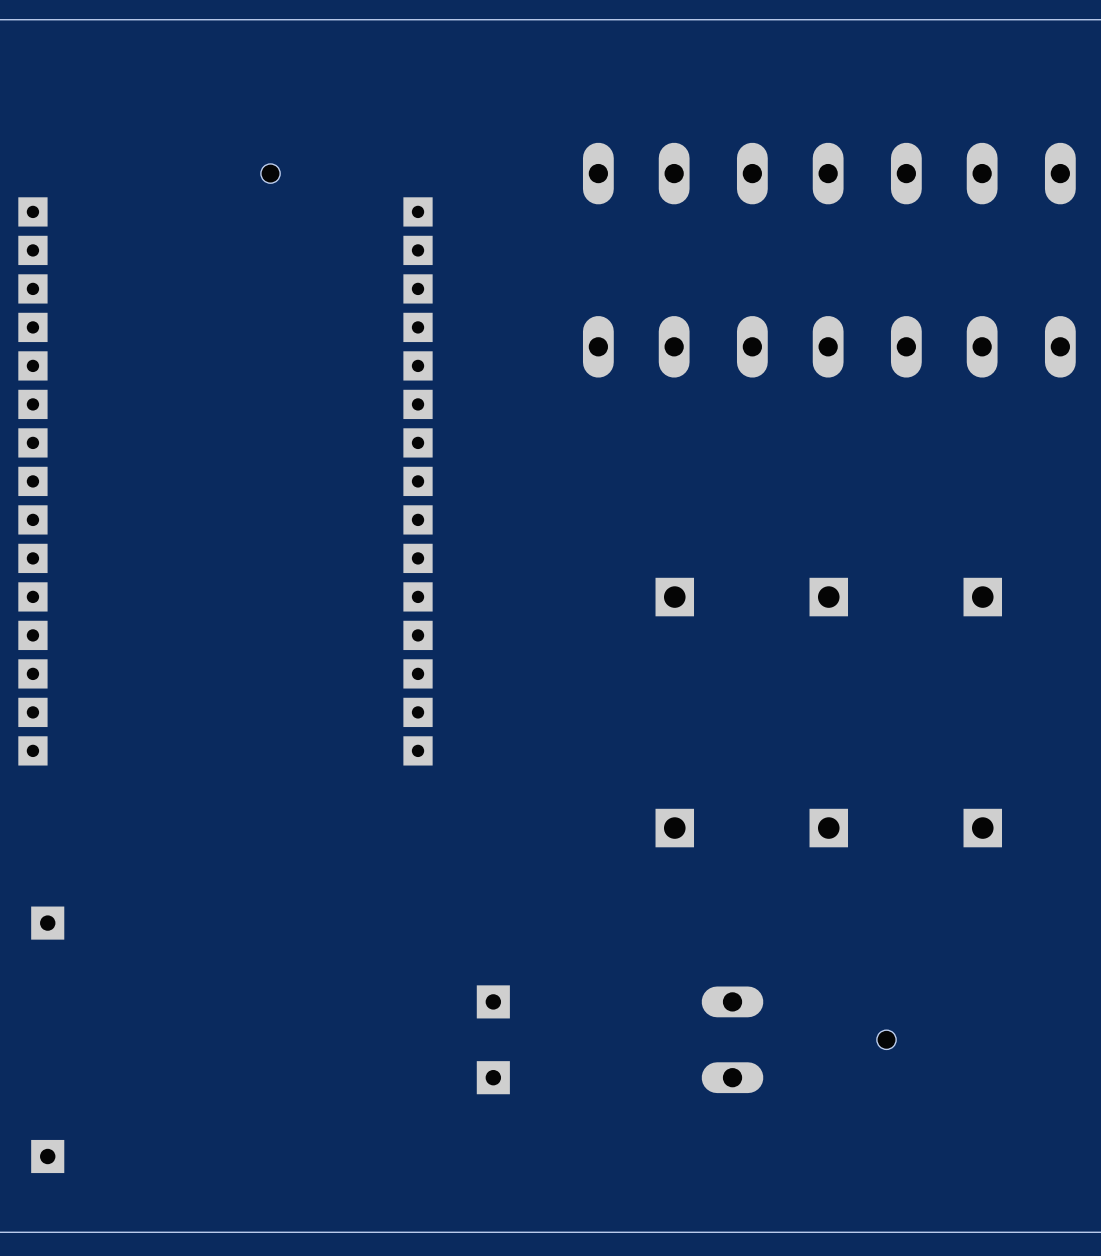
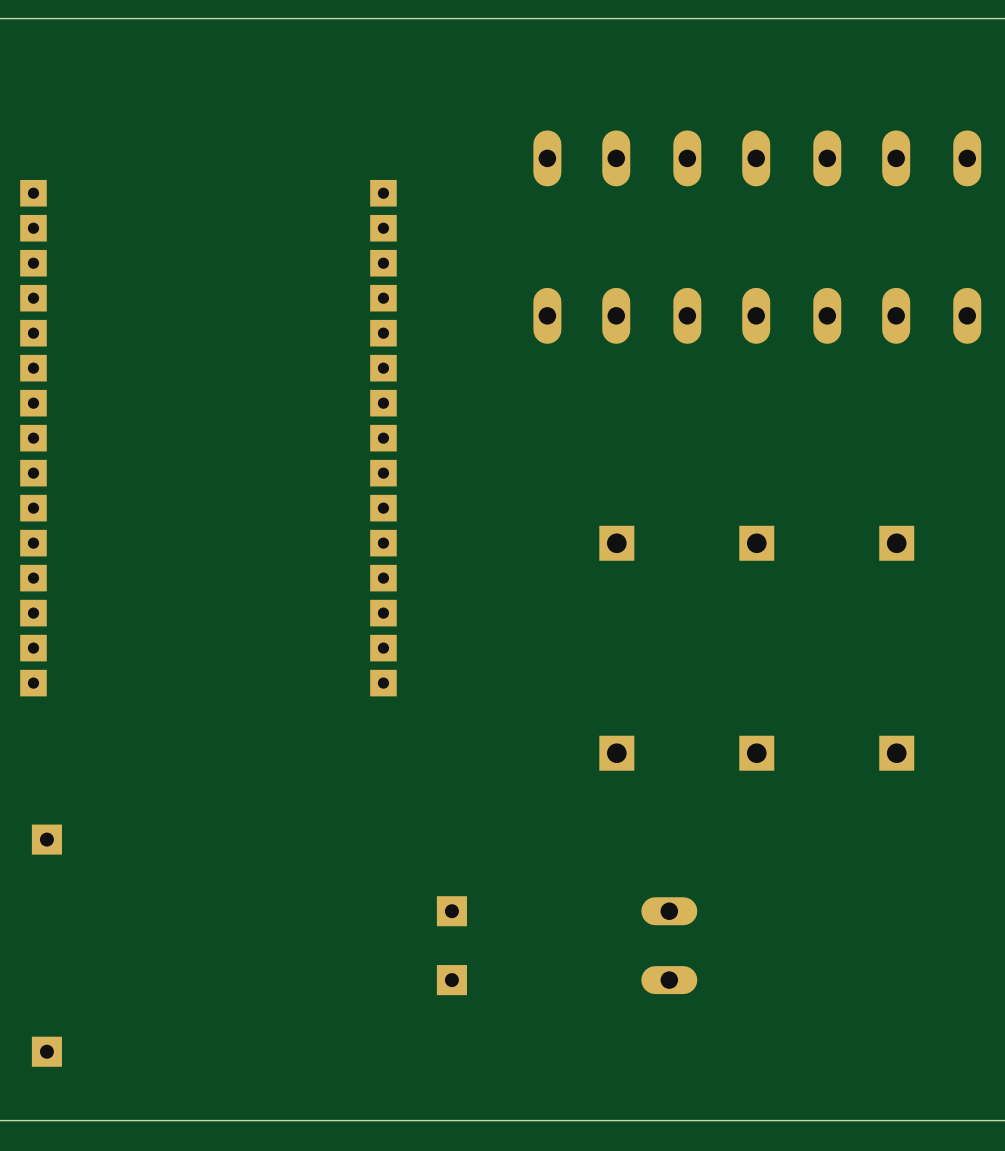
hole: (270, 173) -> none
hole: (886, 1039) -> none

